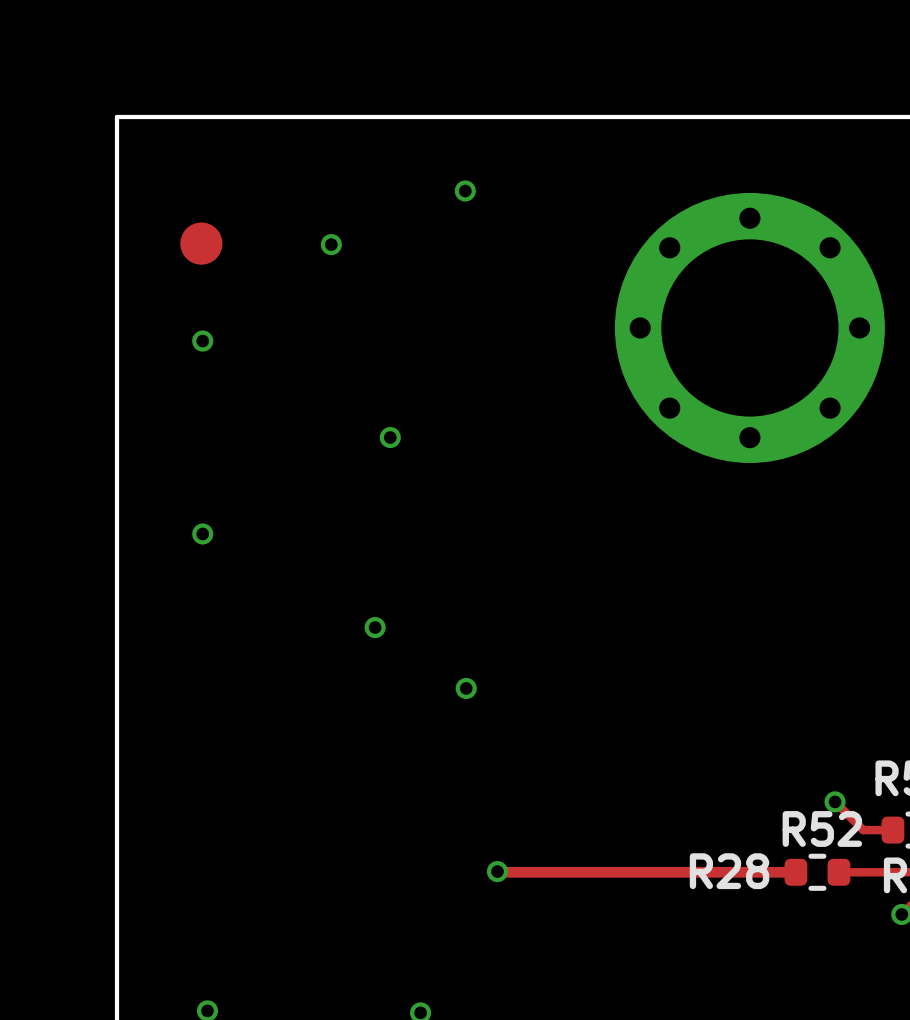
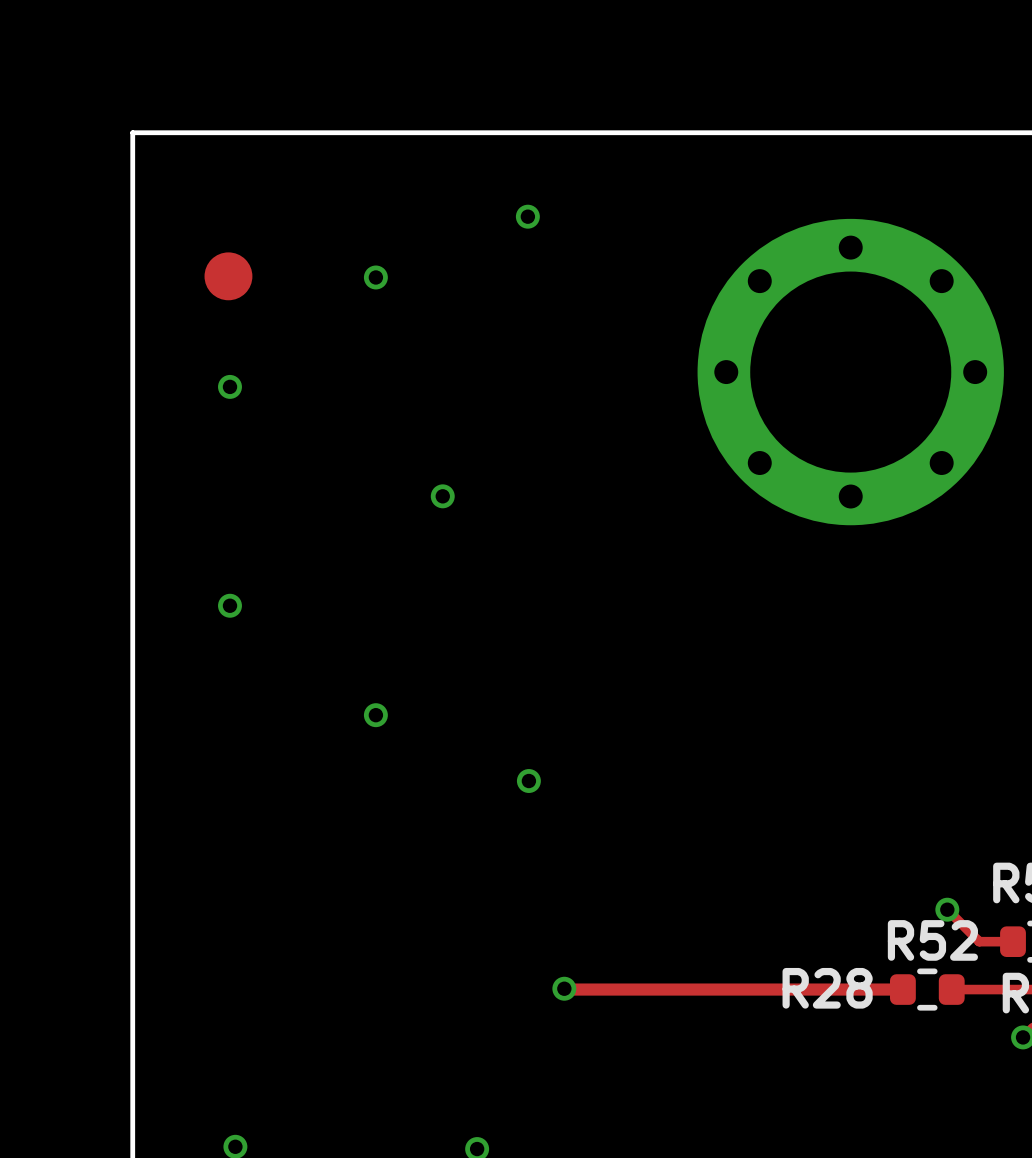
via position: (375, 627) -> (375, 715)

